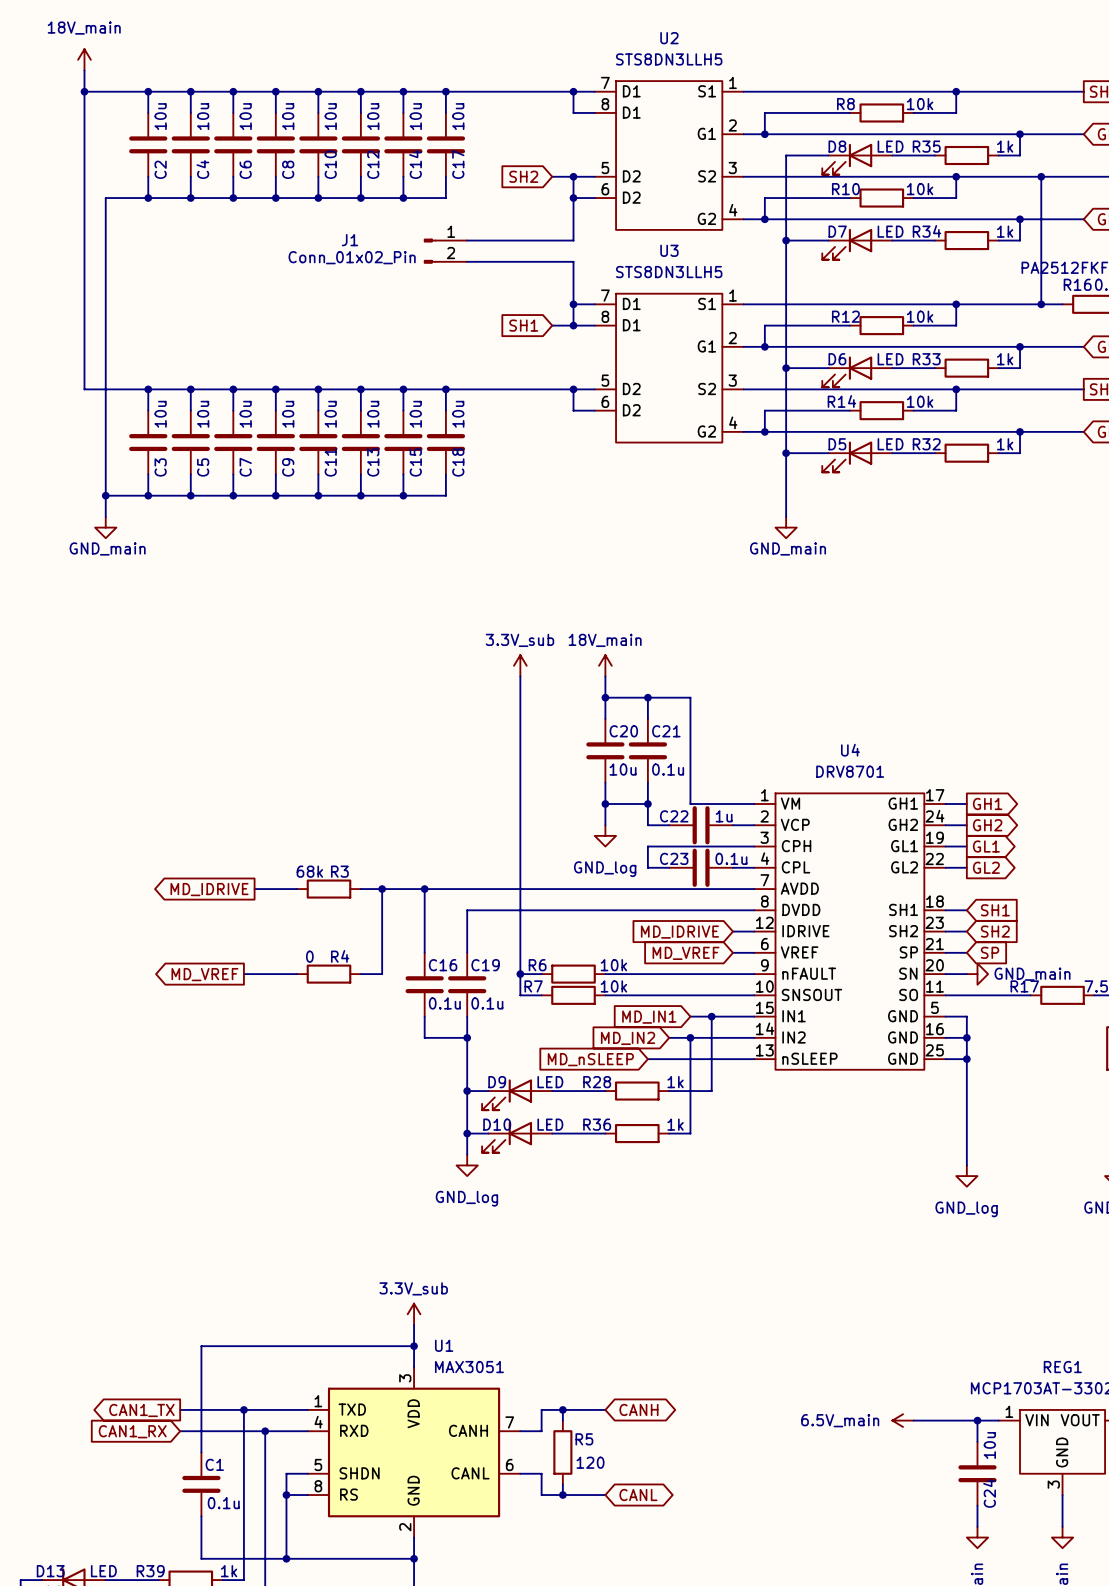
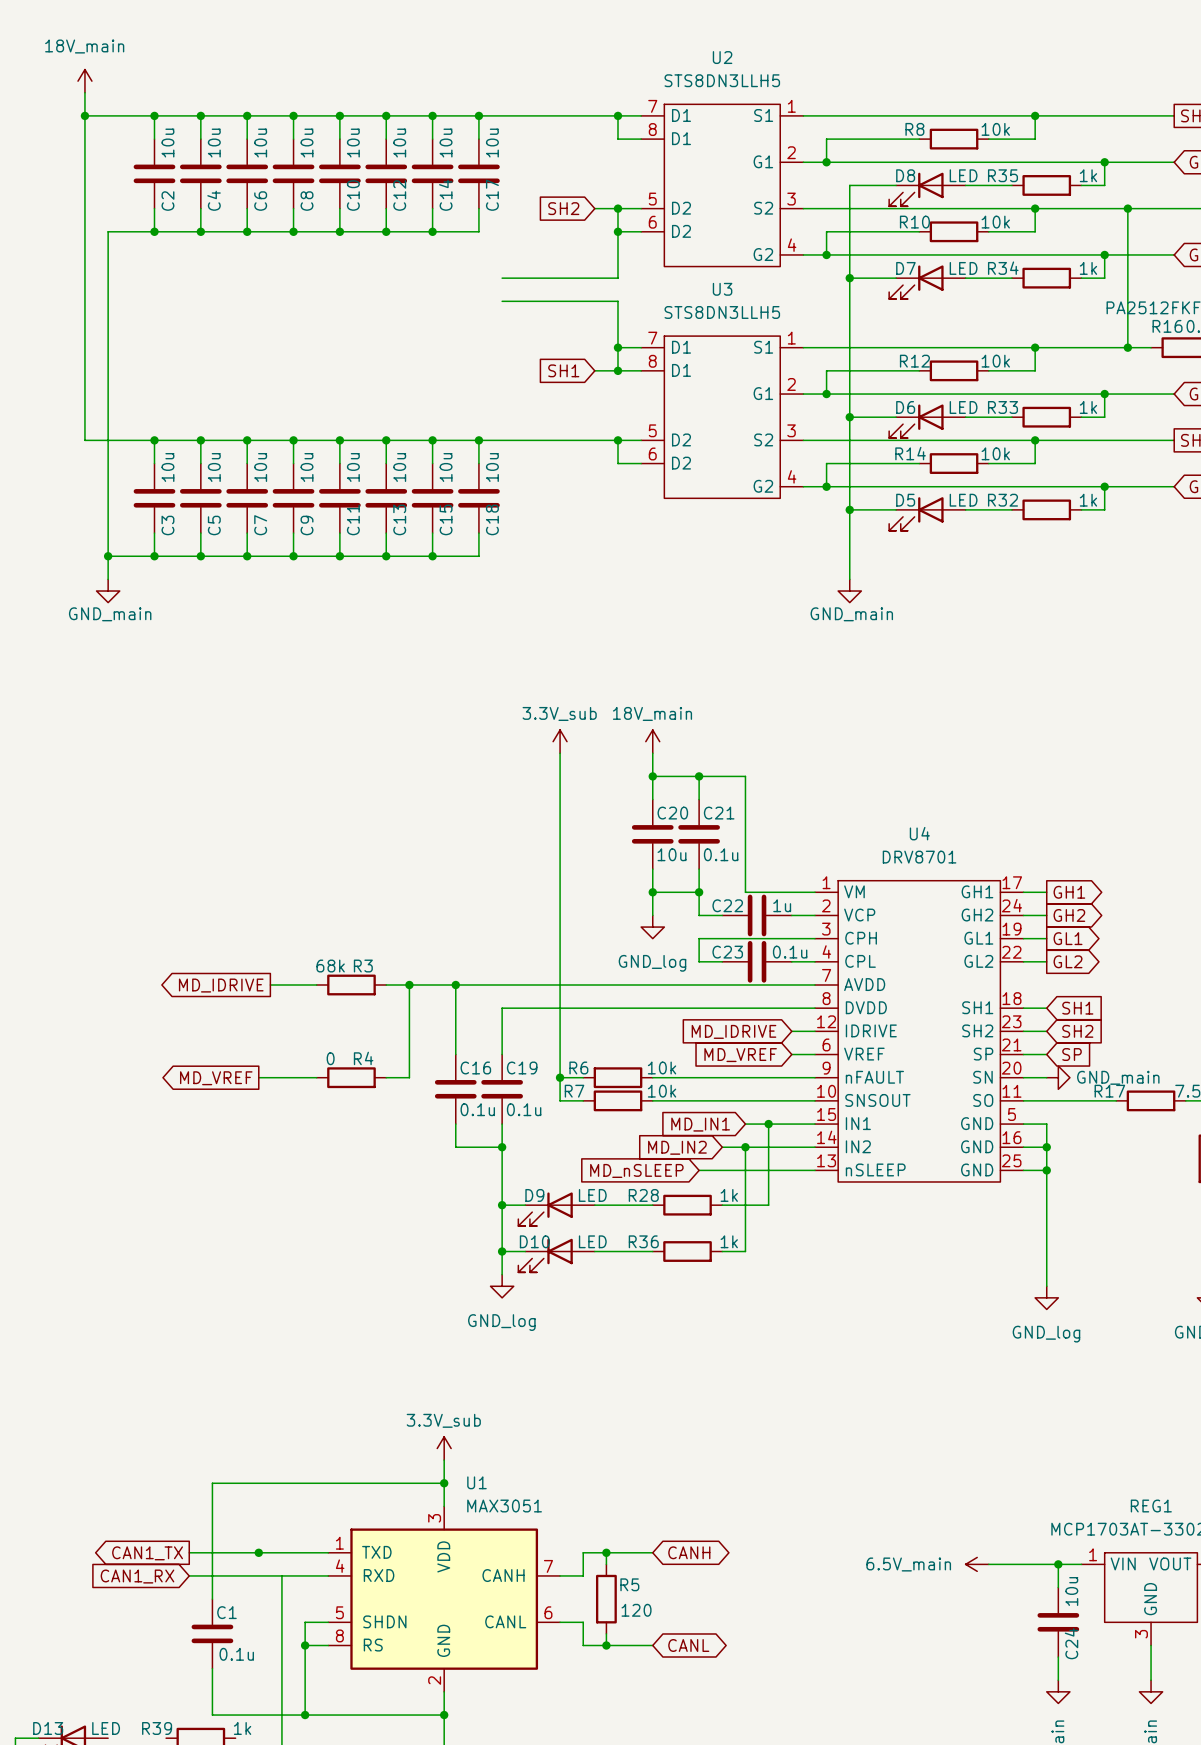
J1: Conn_01x02_Pin (445, 251) -> none
wire: (243, 1409) (243, 1580) (222, 1580) -> none
junction: (265, 1431) -> none
wire: (105, 1580) (158, 1580) -> none

